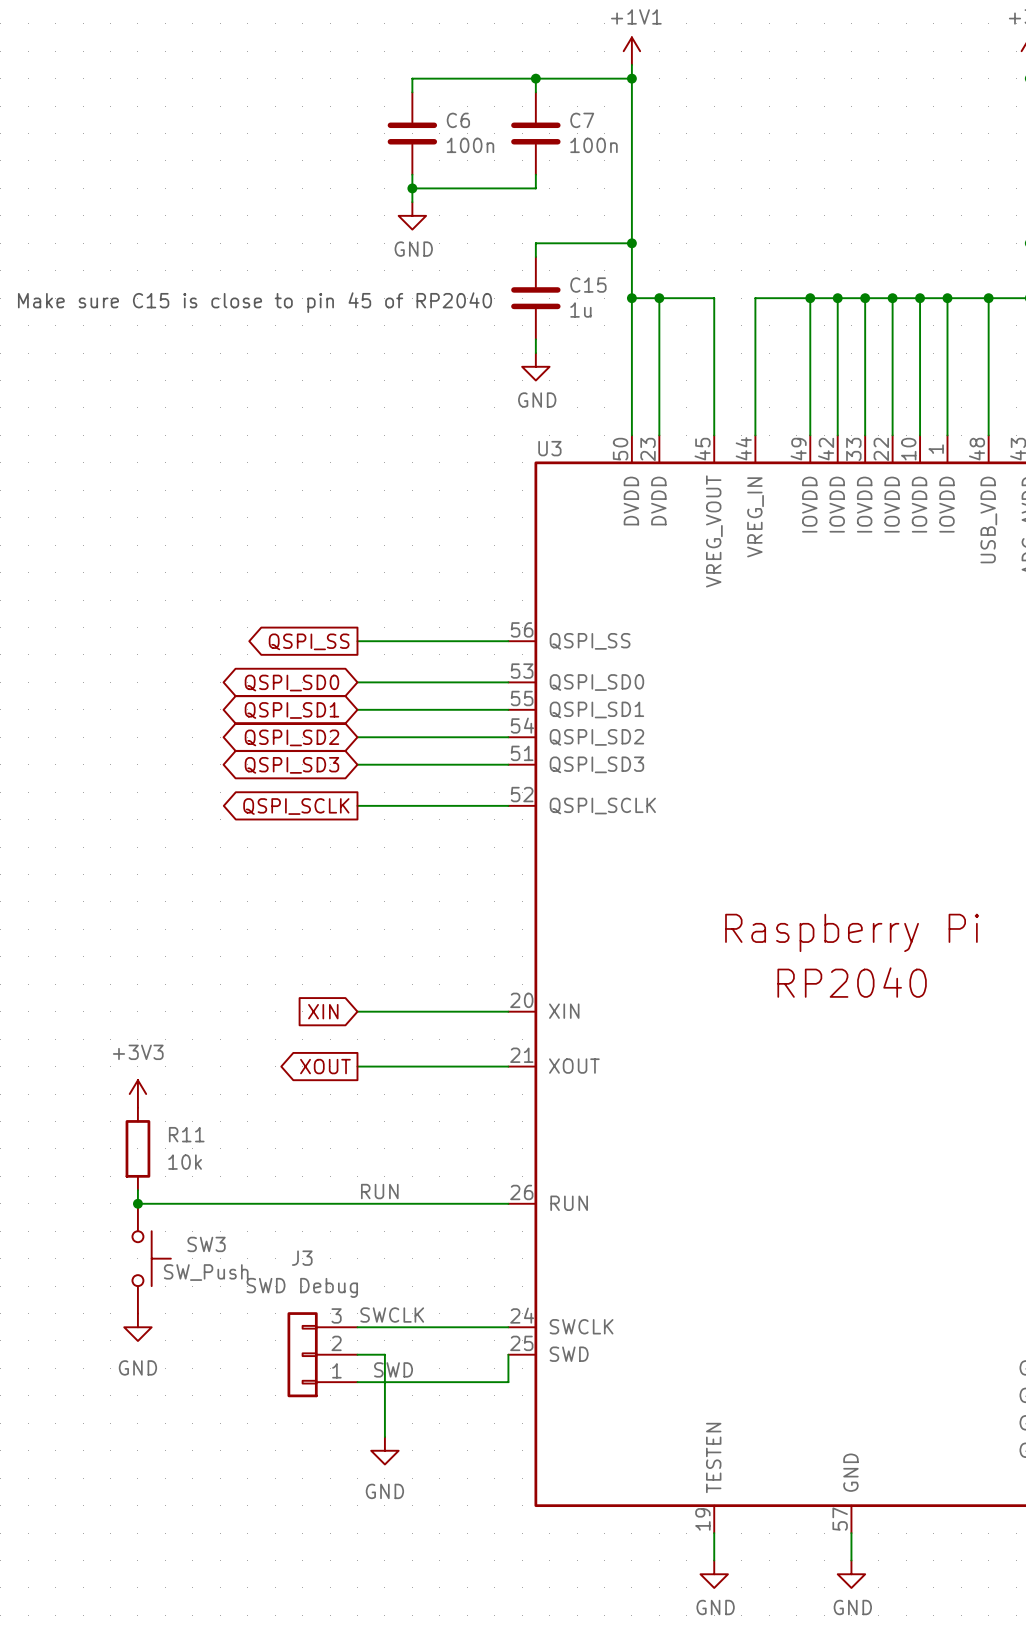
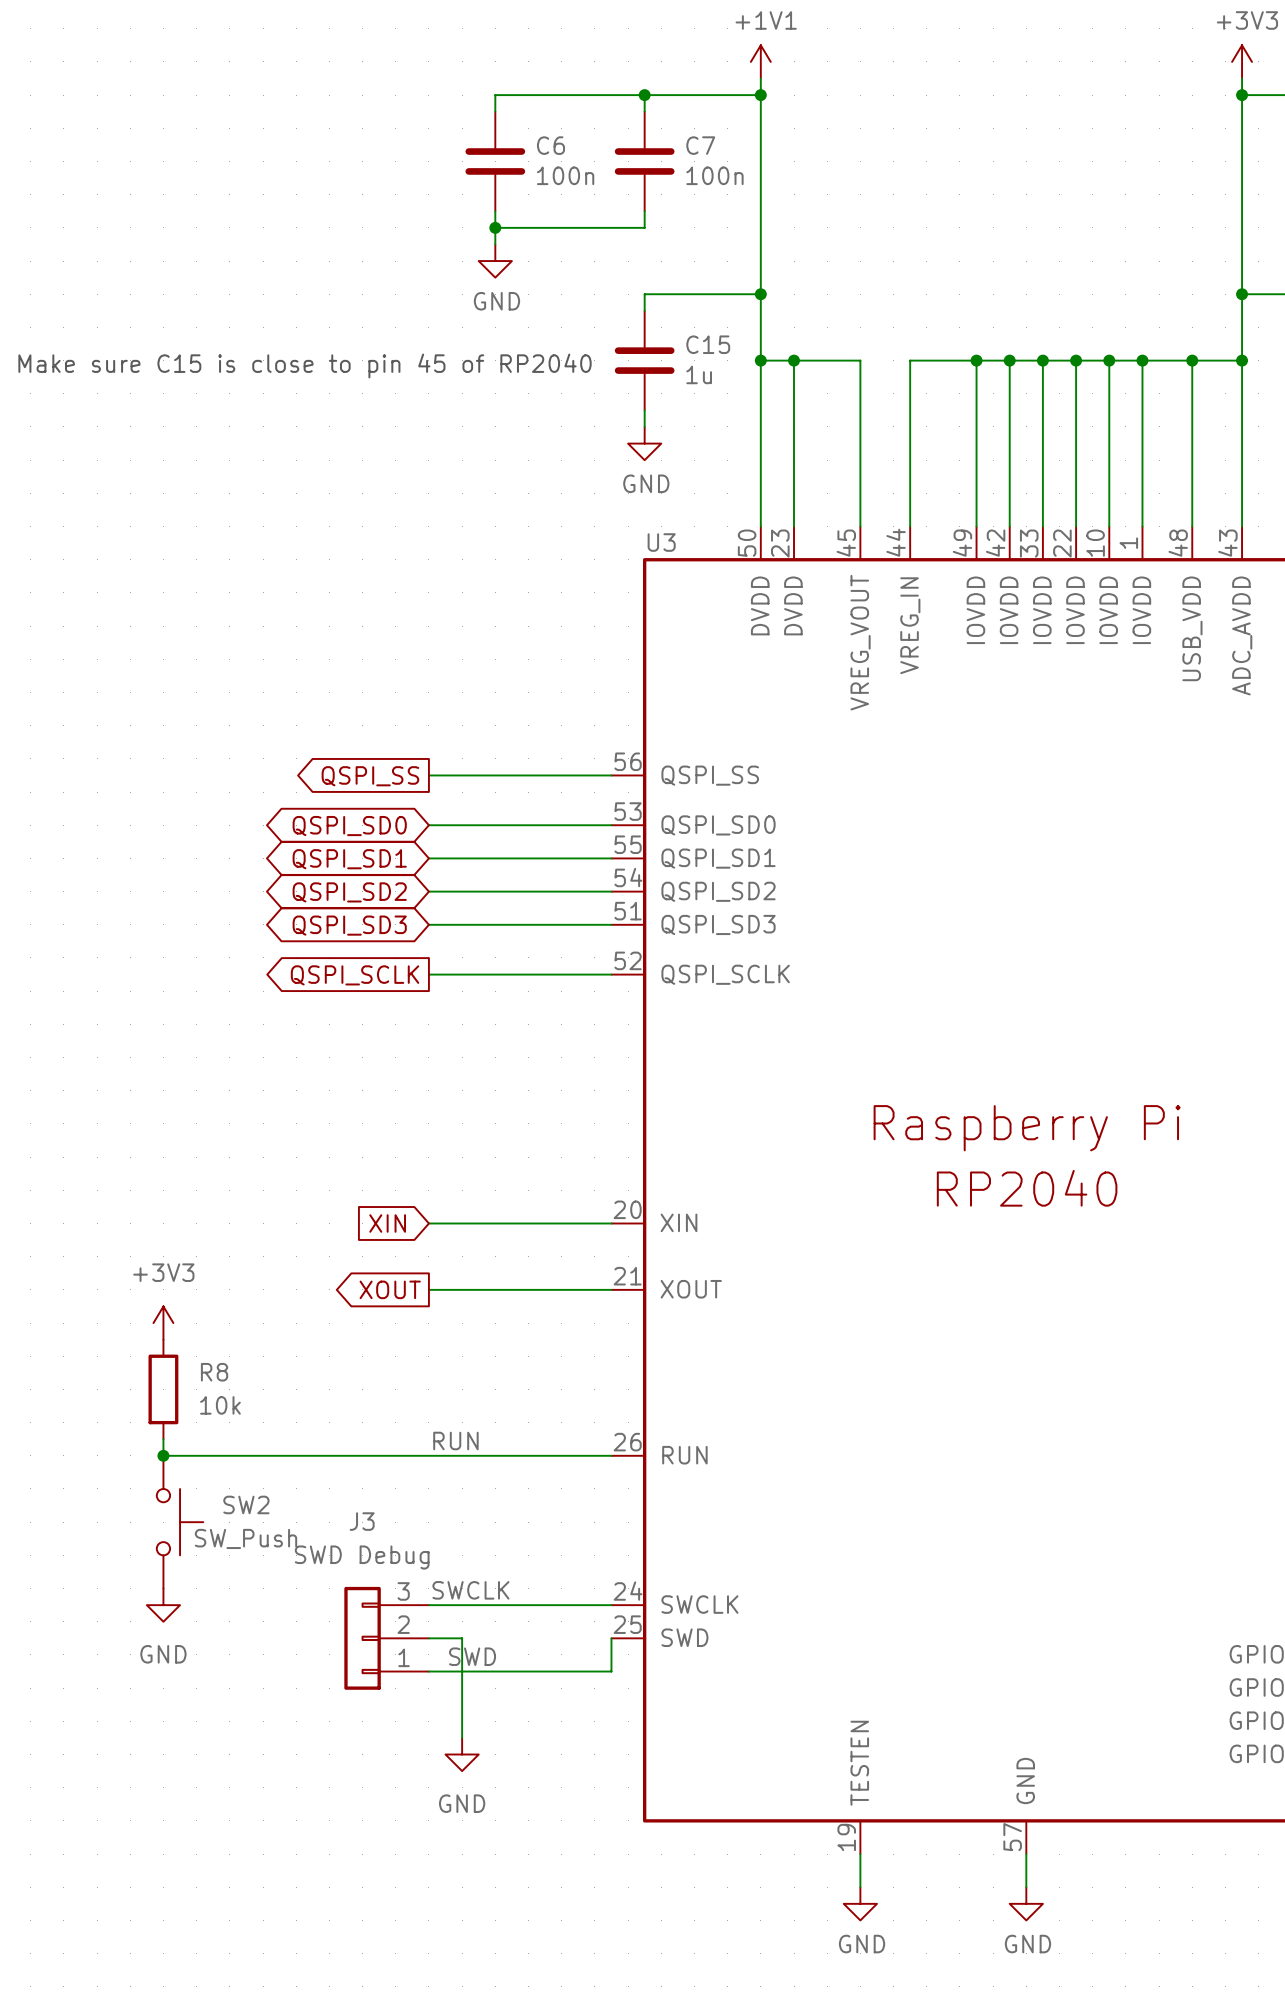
R11 name: R11 (186, 1134) -> R8 (214, 1372)
SW3 name: SW3 (206, 1244) -> SW2 (246, 1504)

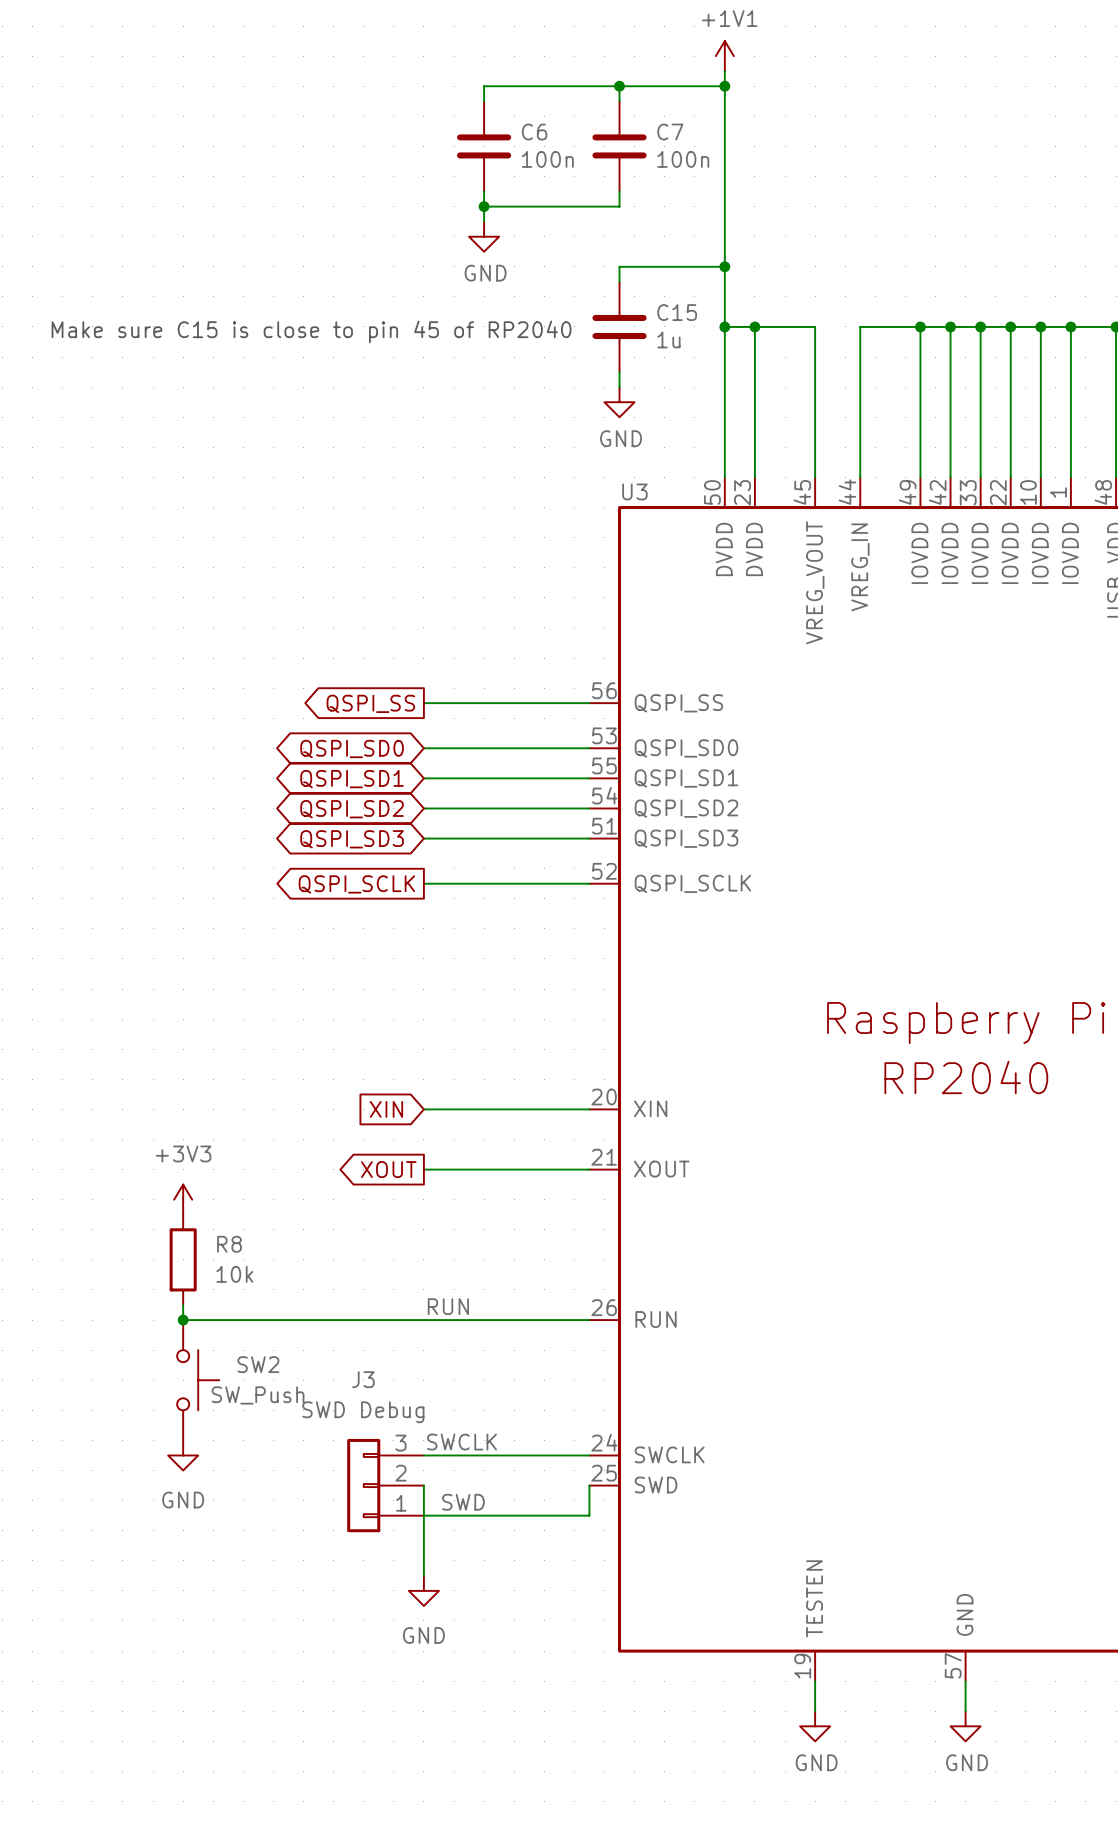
wire: (428, 1638) (462, 1638) (462, 1737) -> (423, 1485) (423, 1575)
power symbol position: GND (462, 1754) -> GND (423, 1590)

